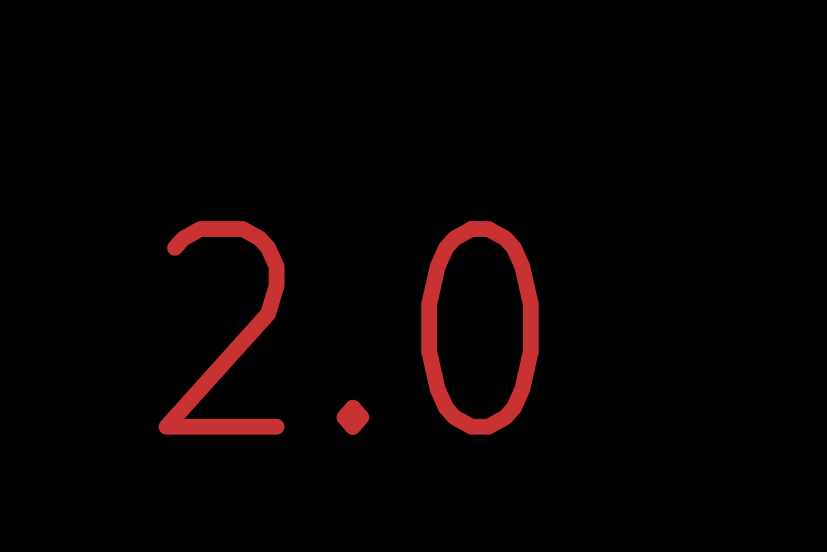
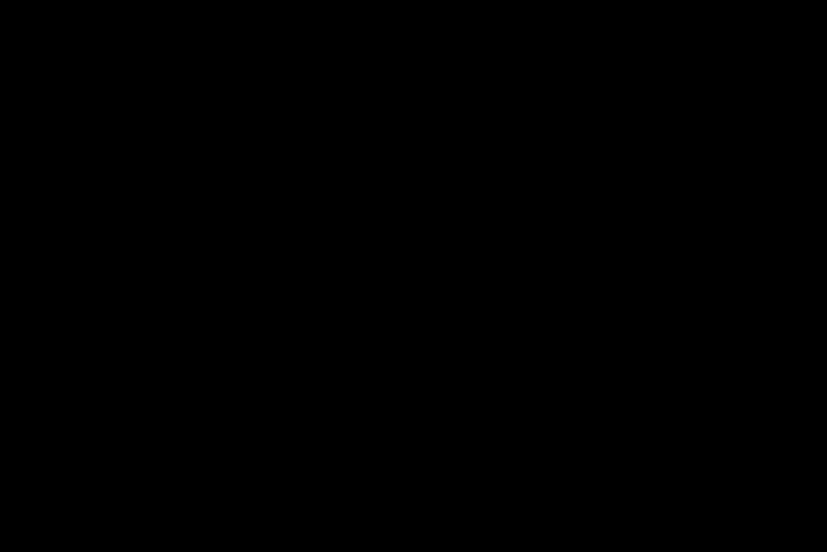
text: 2.0 (348, 327) -> none

